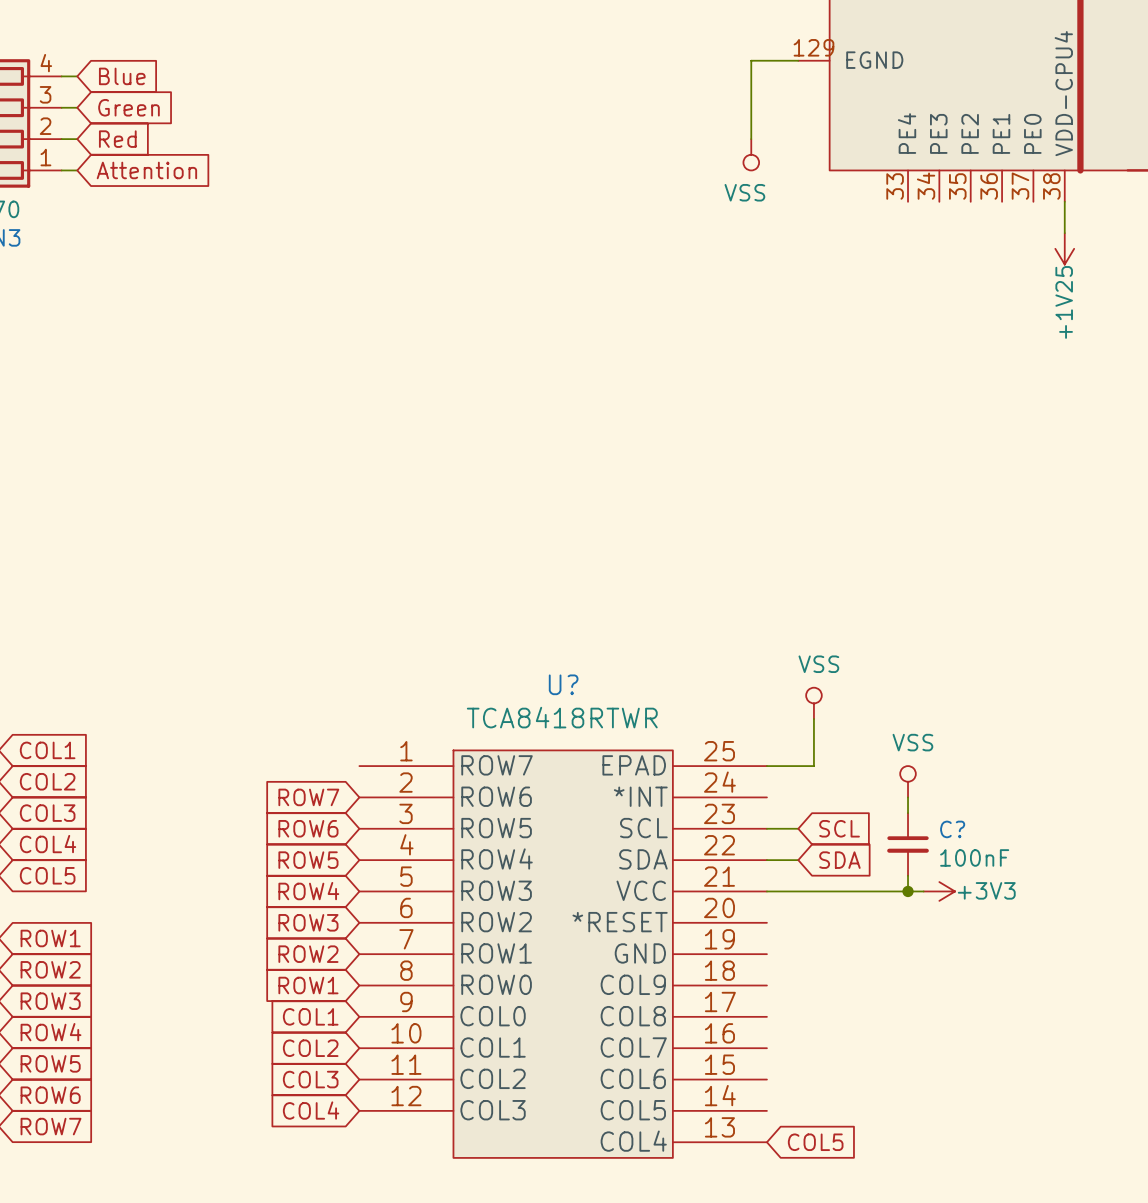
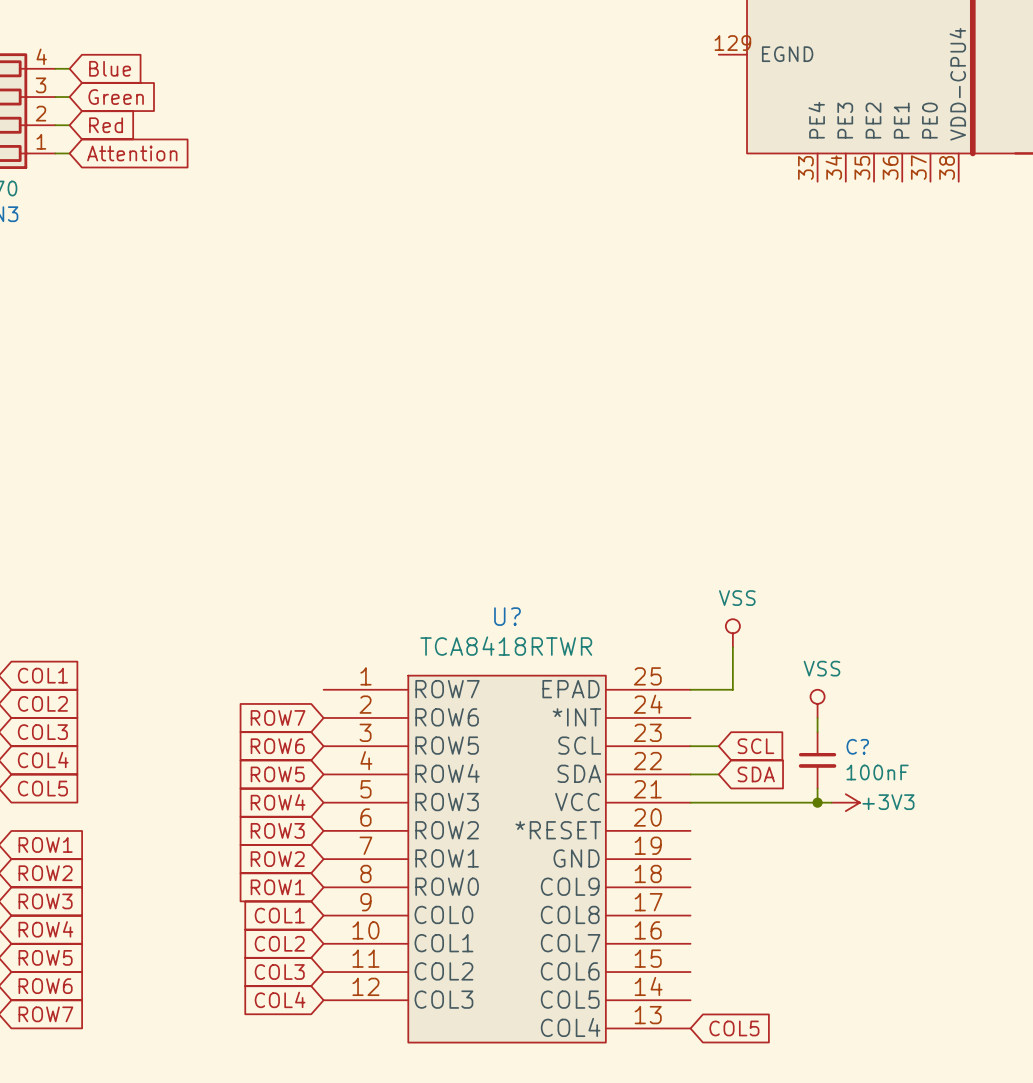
wire: (798, 60) (751, 60) (751, 139) -> none
power symbol: VSS (751, 154) -> none
wire: (1064, 201) (1064, 233) -> none
part: +1V25 (1064, 248) -> none

